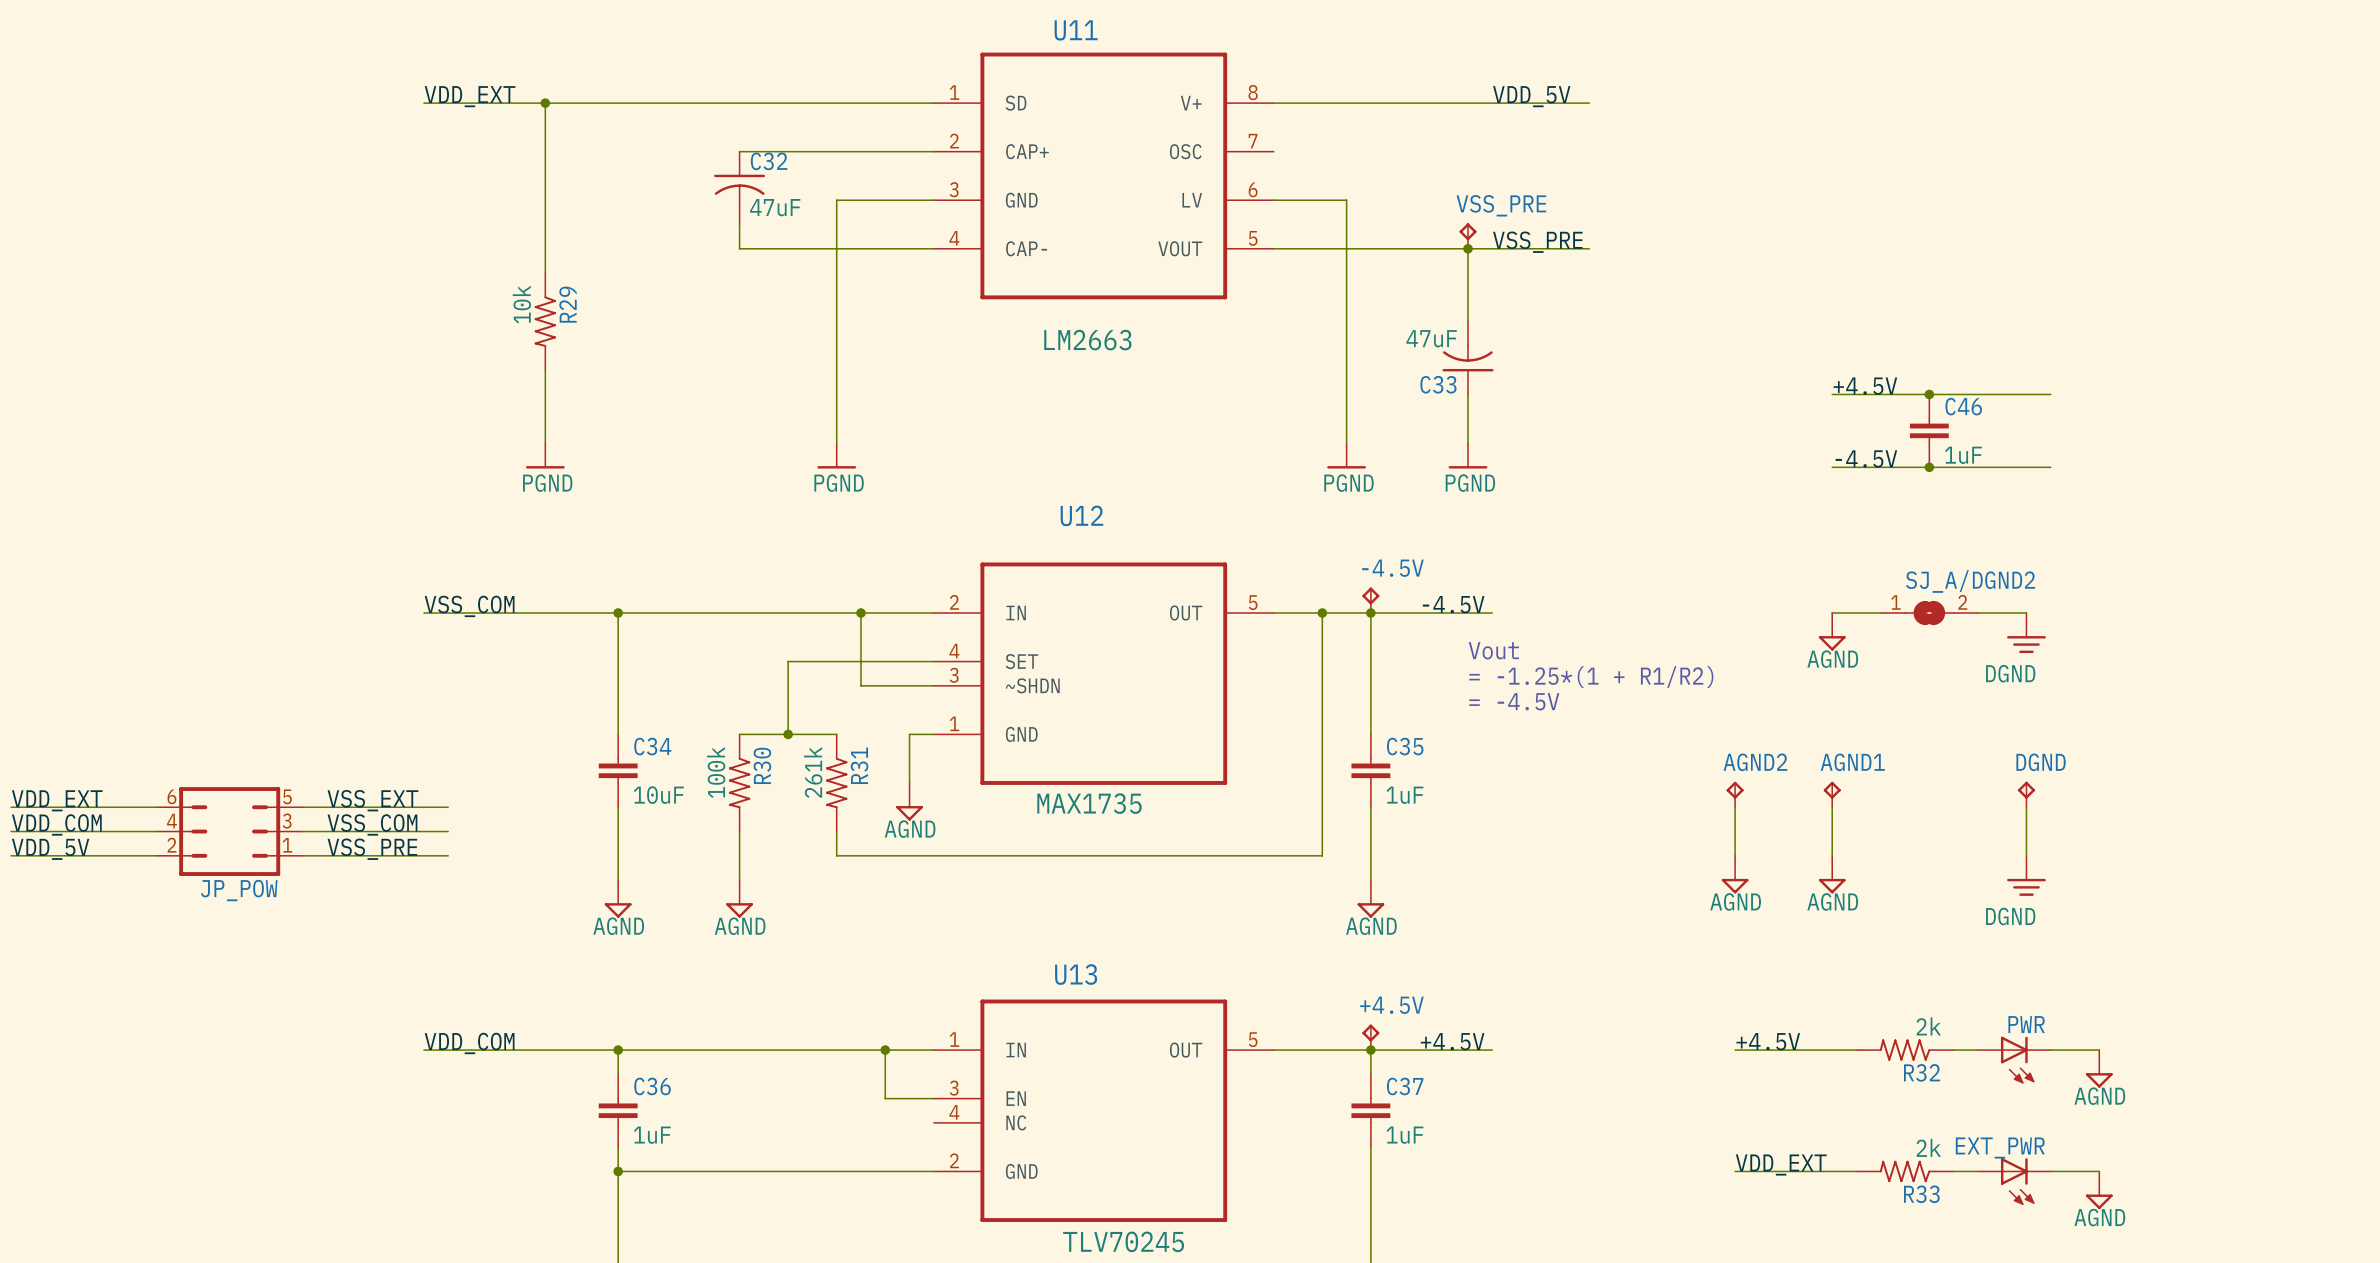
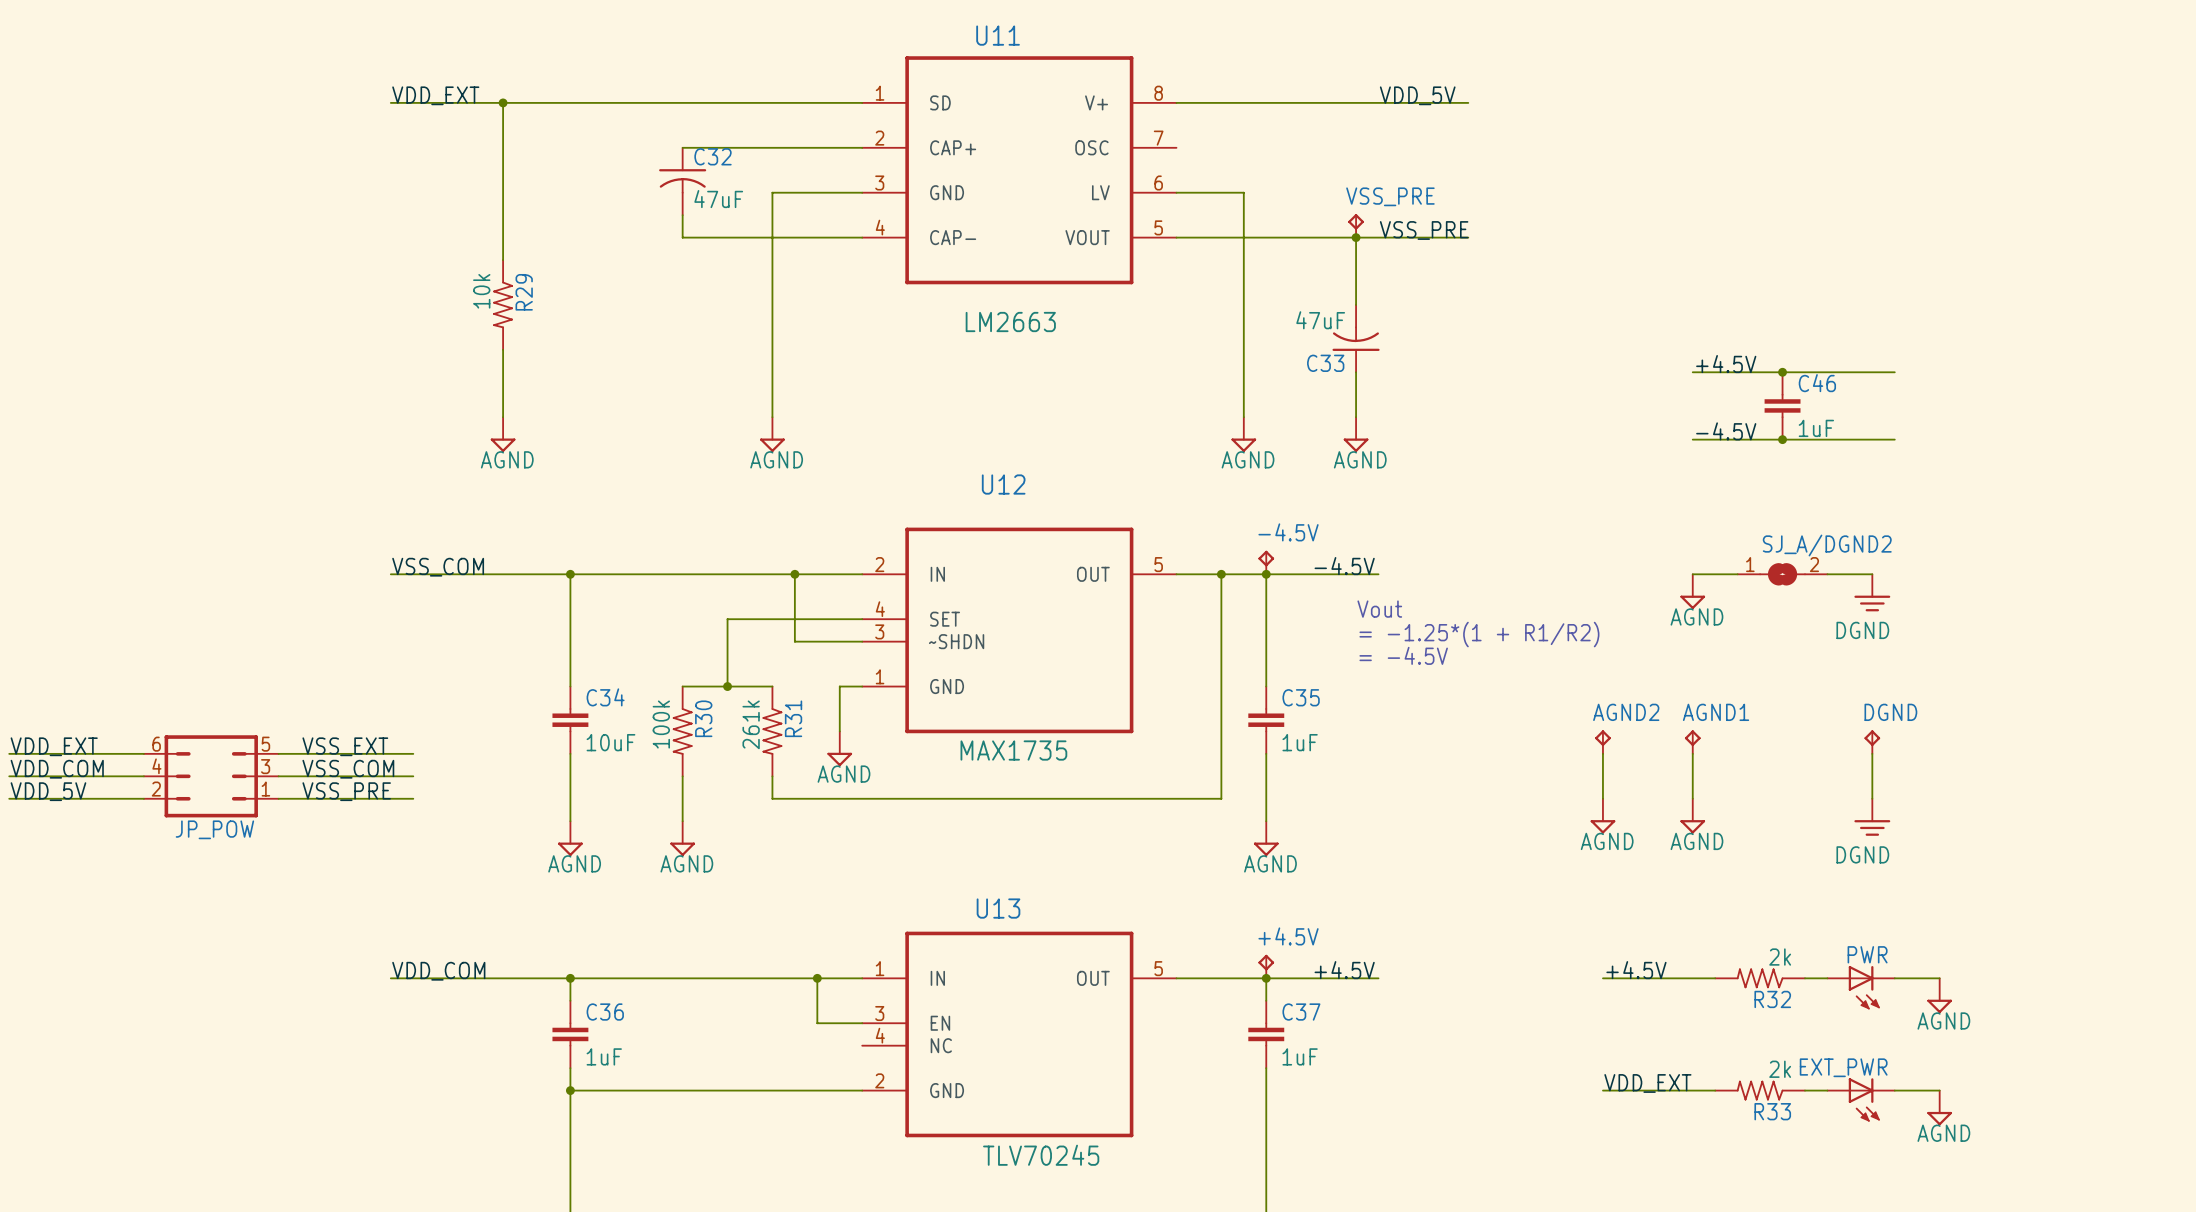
power symbol: PGND (545, 455) -> AGND (503, 434)
power symbol: PGND (836, 455) -> AGND (772, 434)
power symbol: PGND (1346, 455) -> AGND (1243, 434)
power symbol: PGND (1468, 455) -> AGND (1356, 434)

